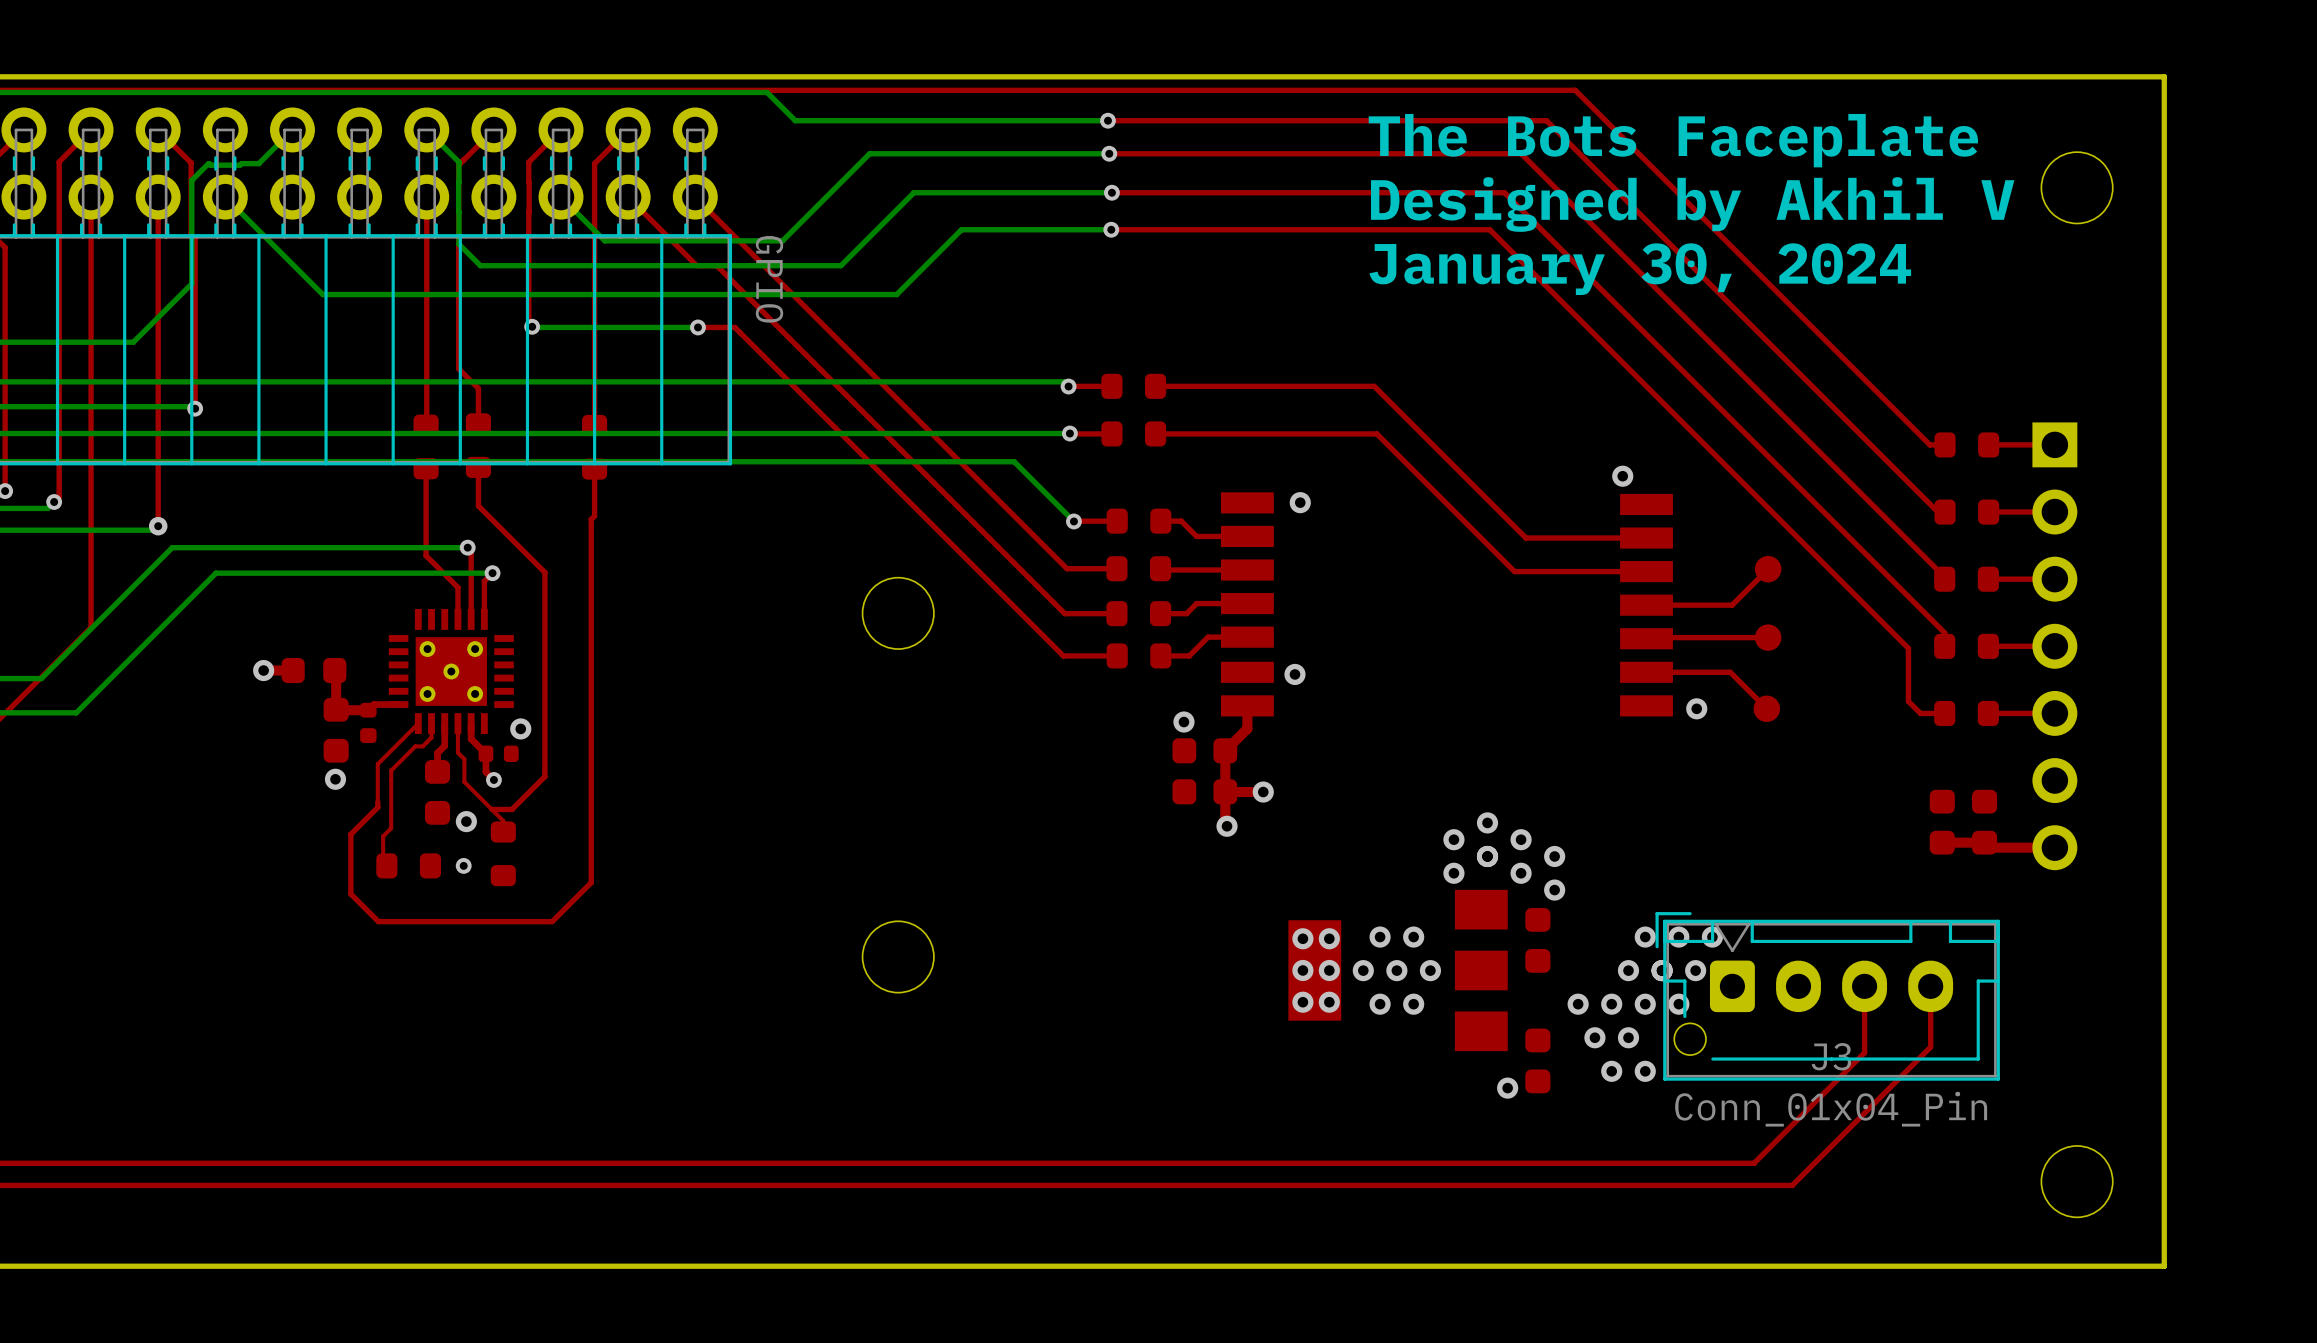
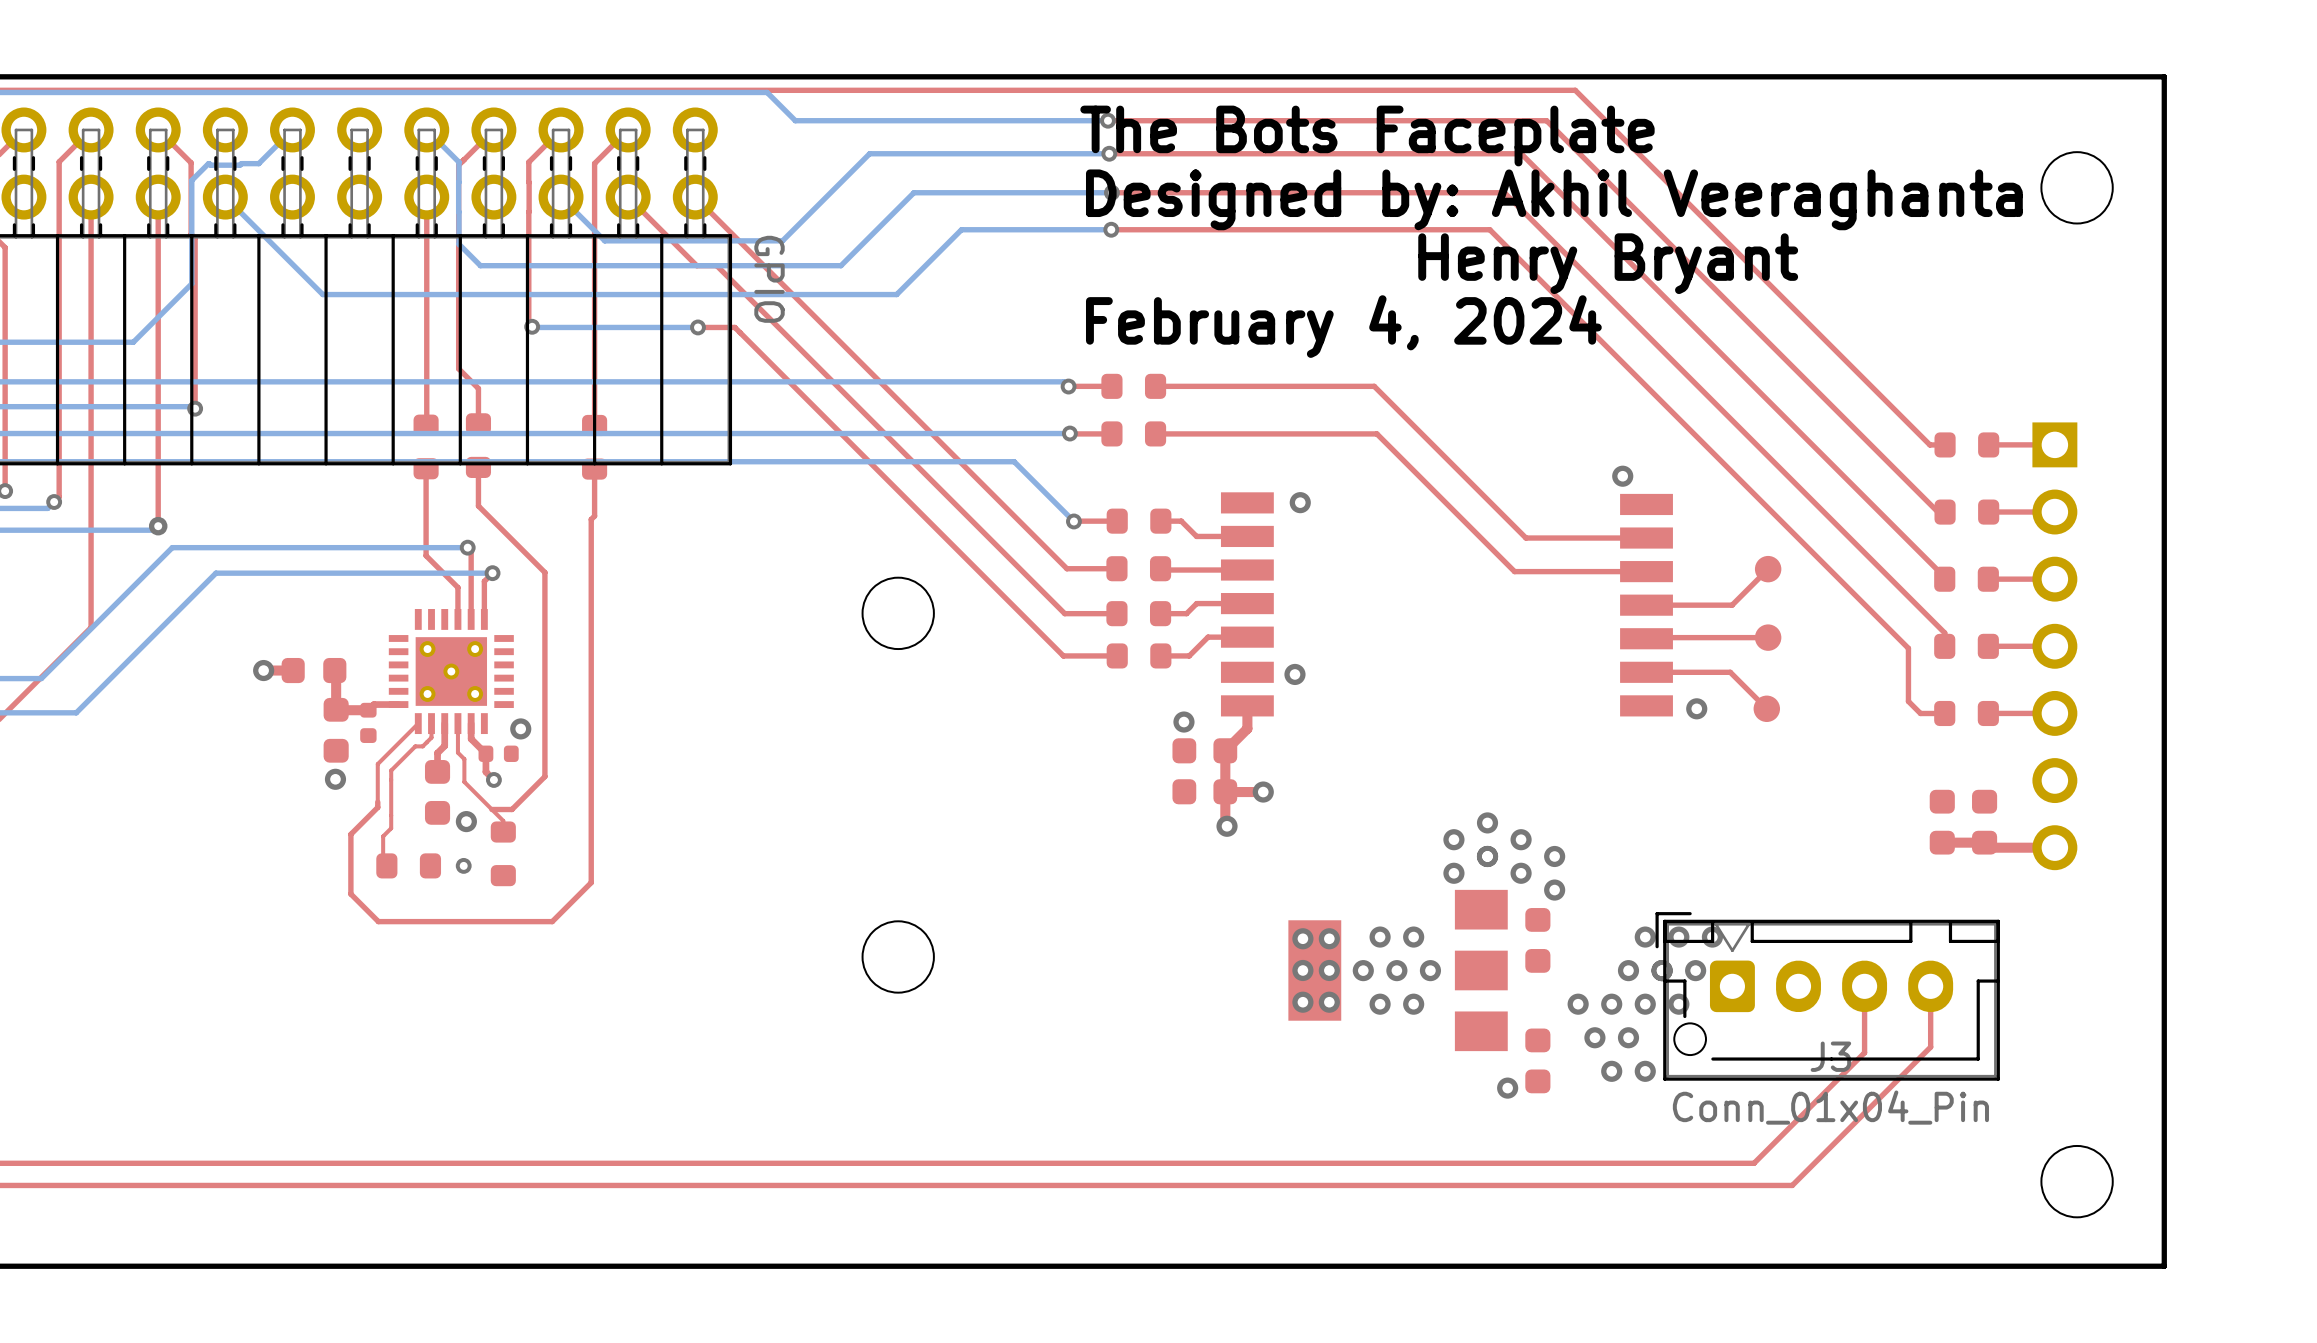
text position: The Bots Faceplate (1673, 140) -> The Bots Faceplate (1367, 136)
text: Designed by Akhil V (1692, 204) -> Designed by: Akhil Veeraghanta (1554, 199)
text: none -> Henry Bryant (1608, 263)
text: January 30, 2024 (1640, 269) -> February 4, 2024 (1343, 326)

